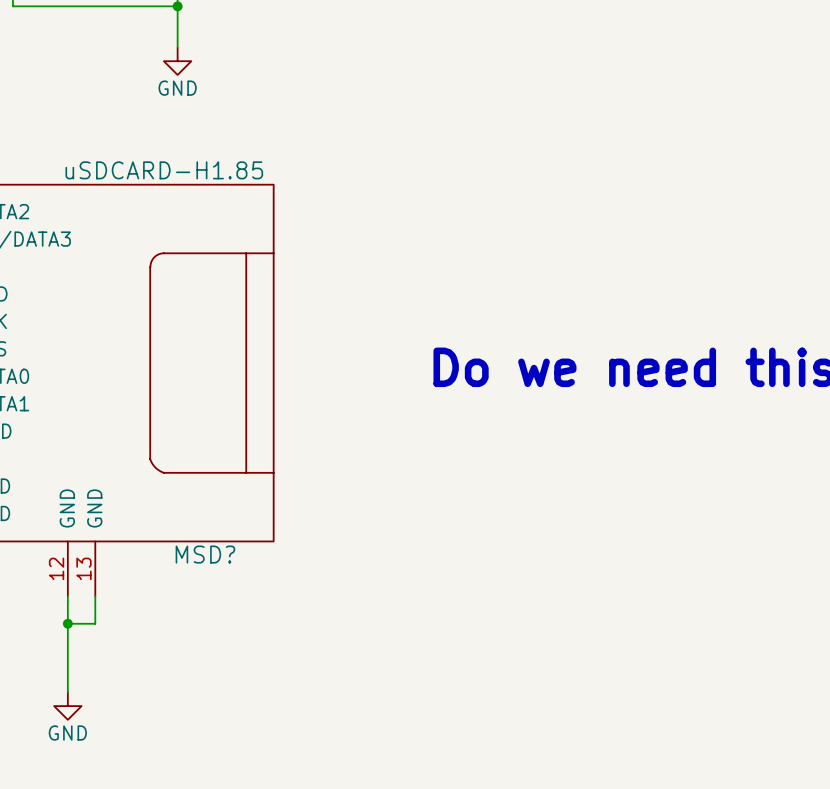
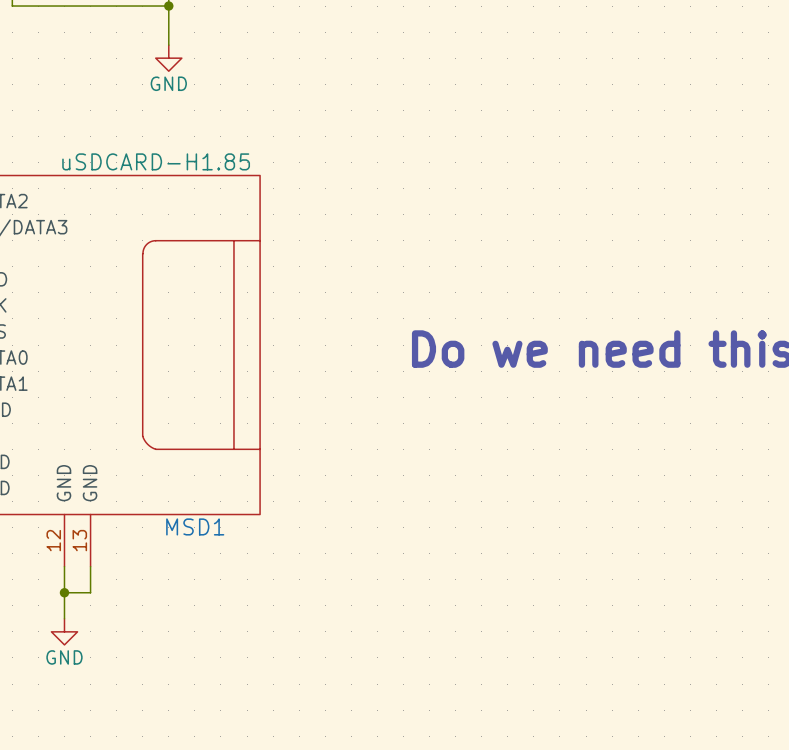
MSD? name: MSD? (205, 554) -> MSD1 (195, 526)
wire: (67, 651) (67, 692) -> none
power symbol position: GND (67, 706) -> GND (64, 631)

